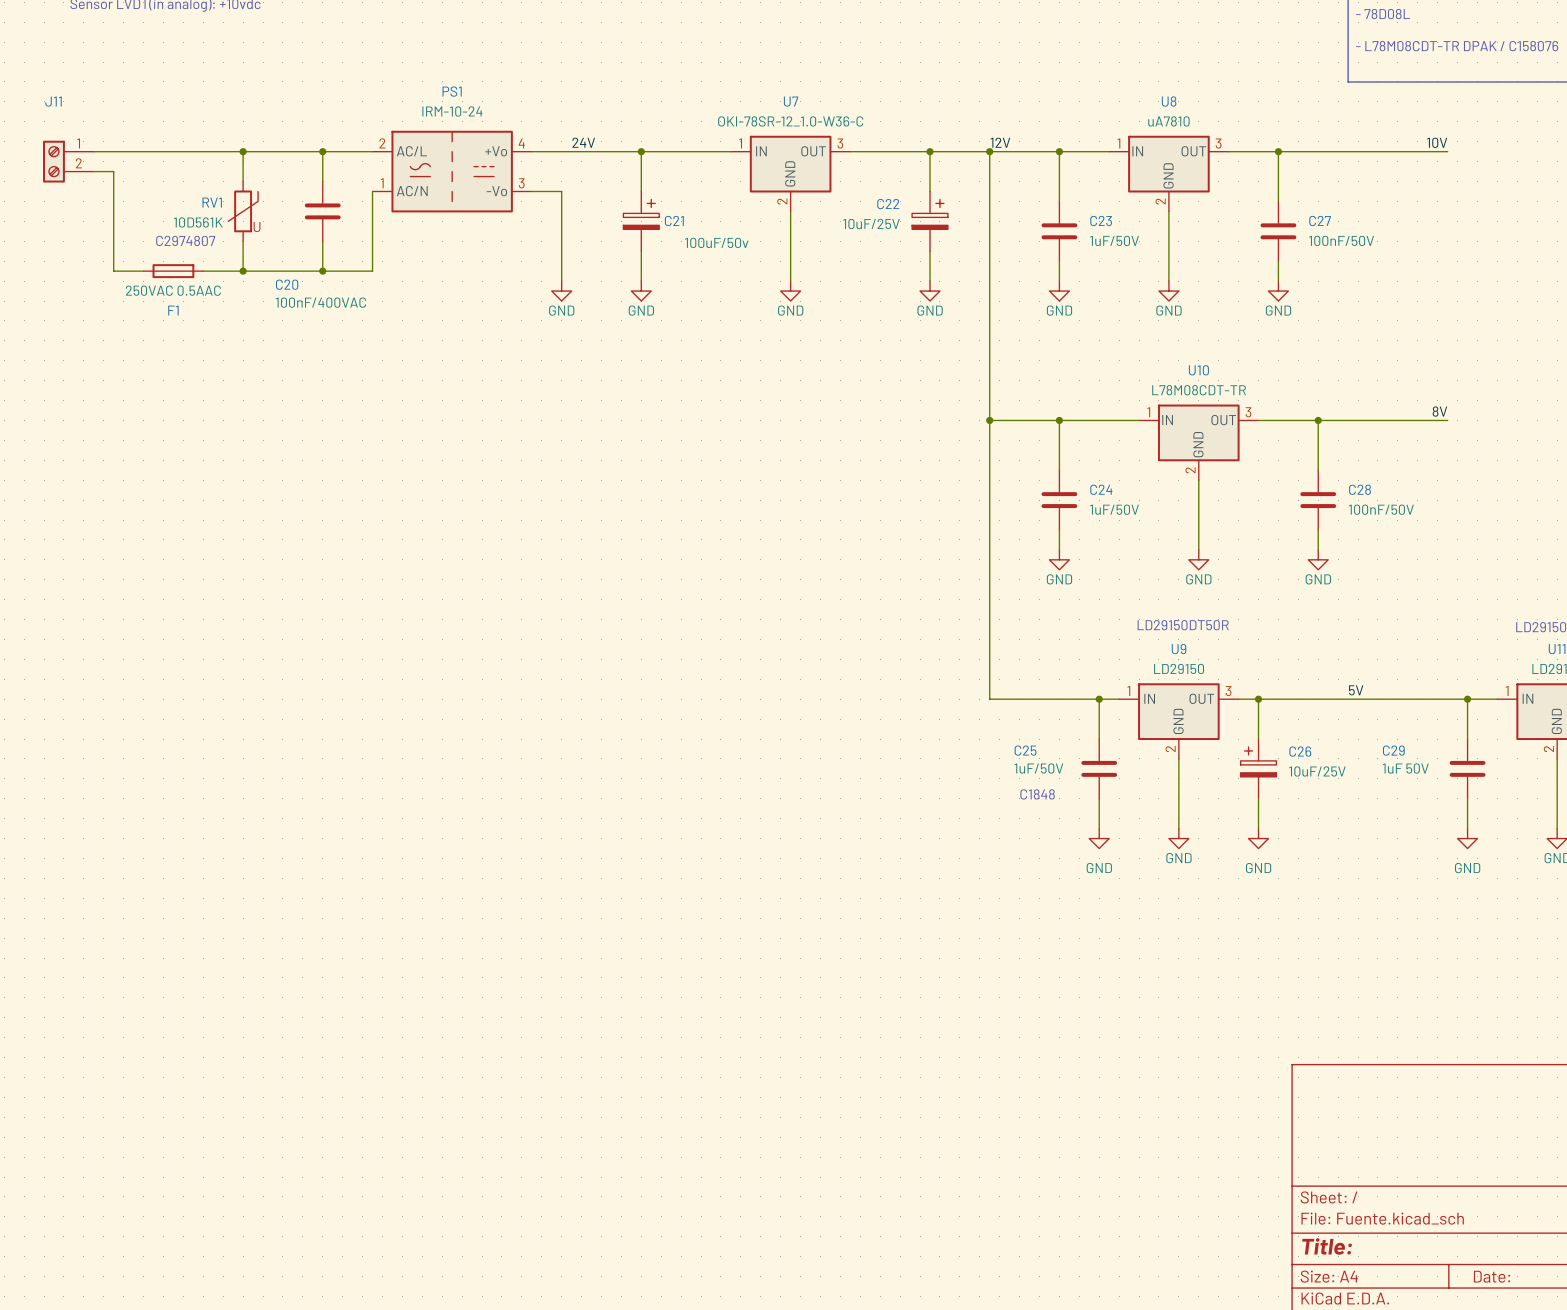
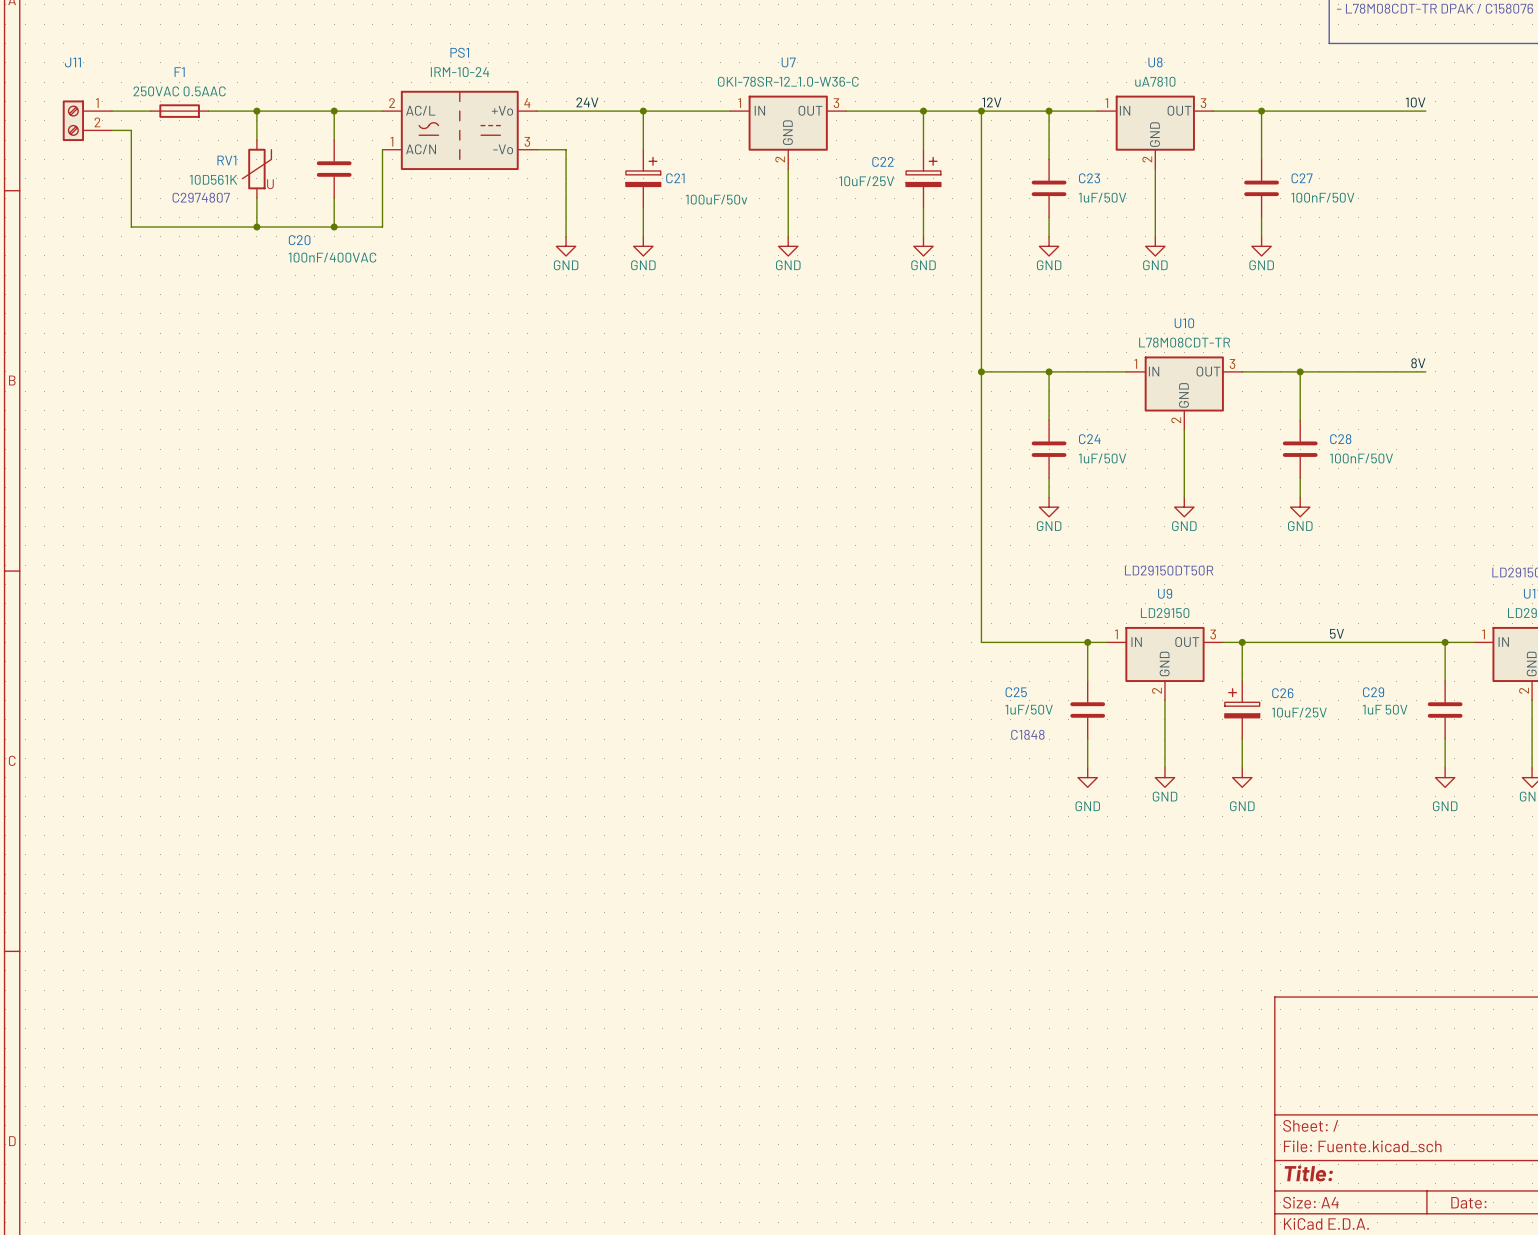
F1 position: (173, 271) -> (179, 111)
F1 value position: 250VAC 0.5AAC (173, 290) -> 250VAC 0.5AAC (179, 91)
F1 name position: F1 (173, 310) -> F1 (179, 72)

